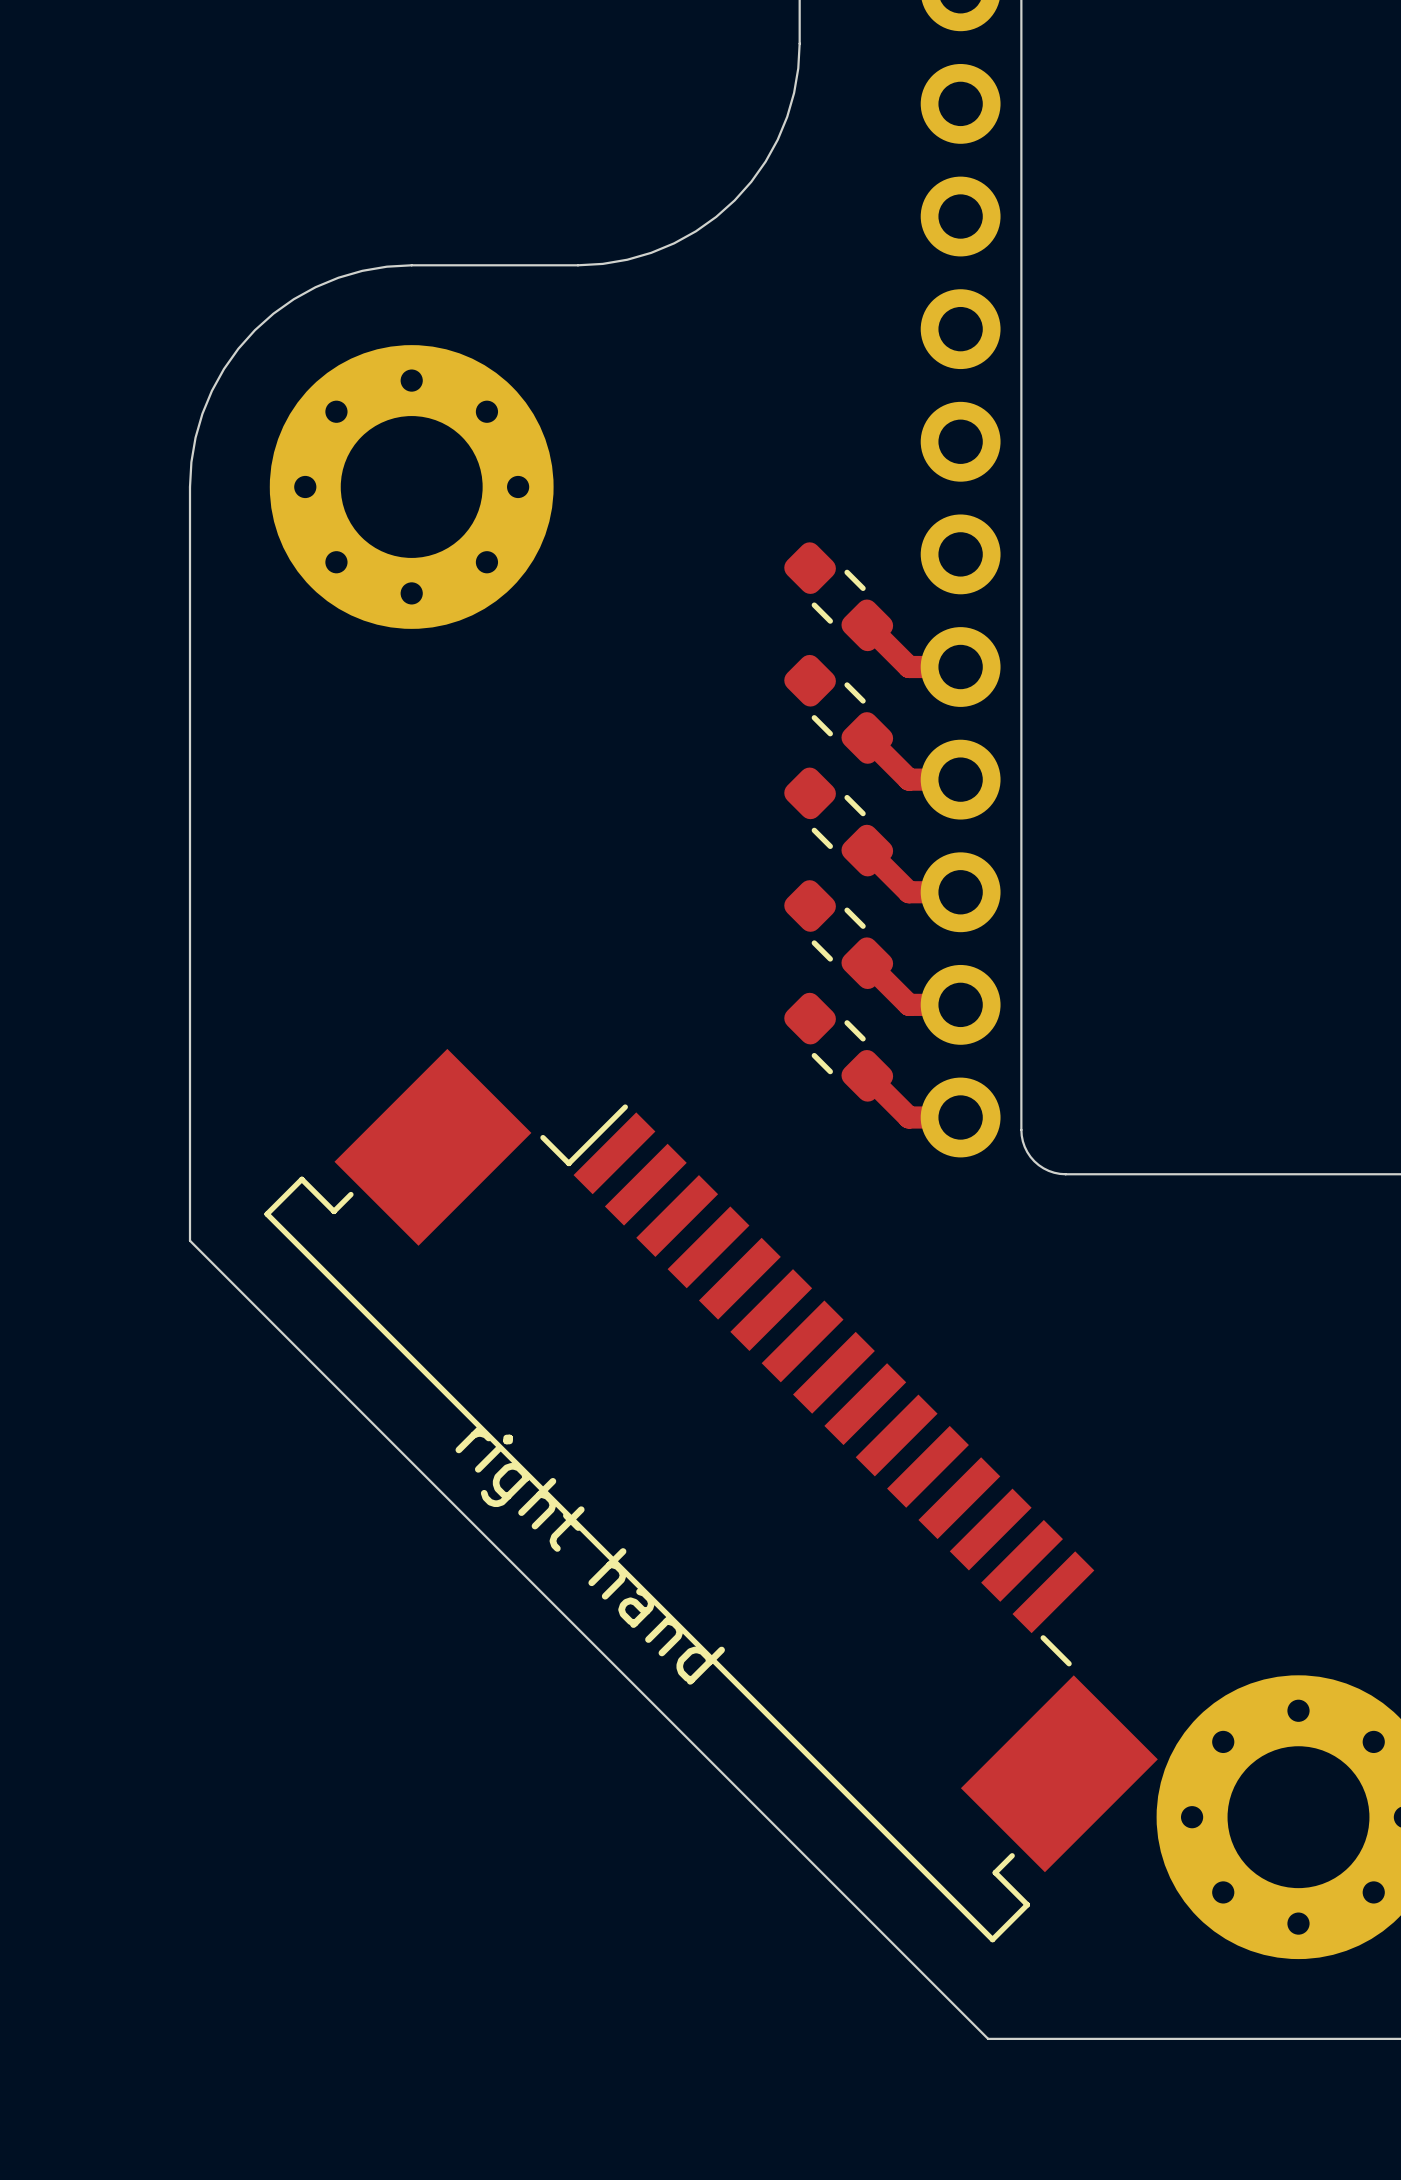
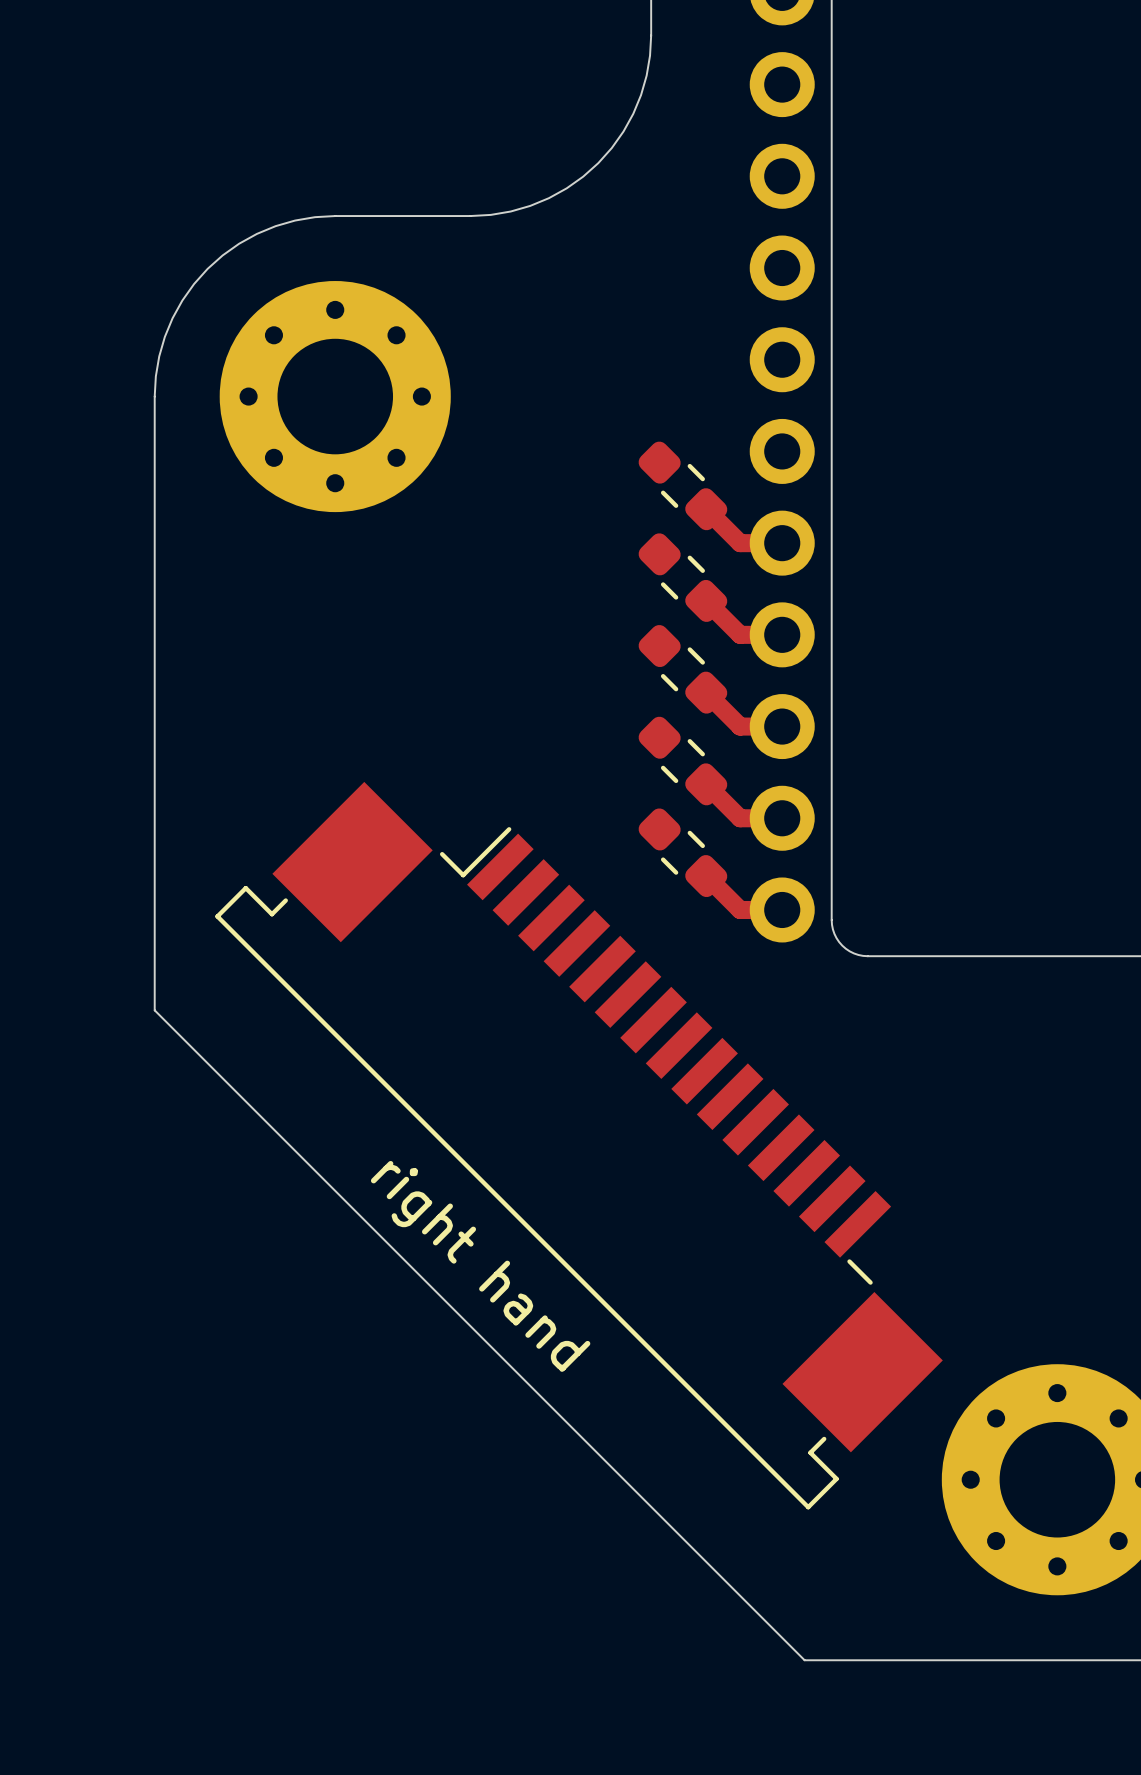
part position: (711, 1495) -> (579, 1145)

